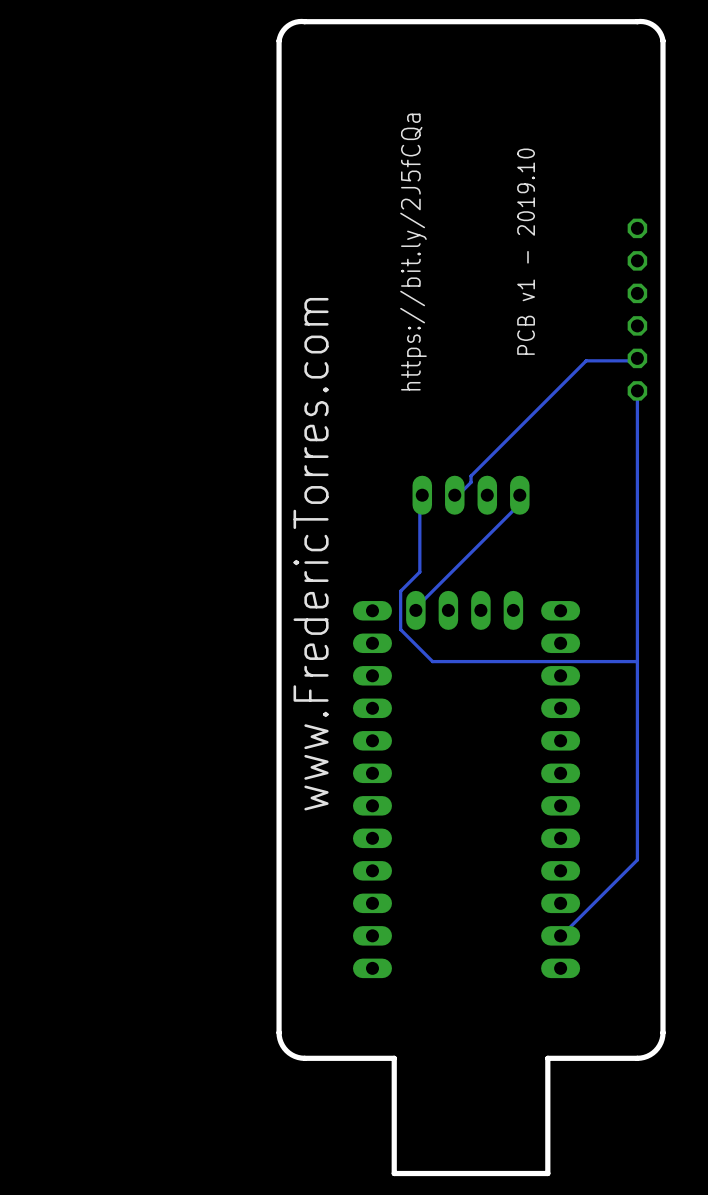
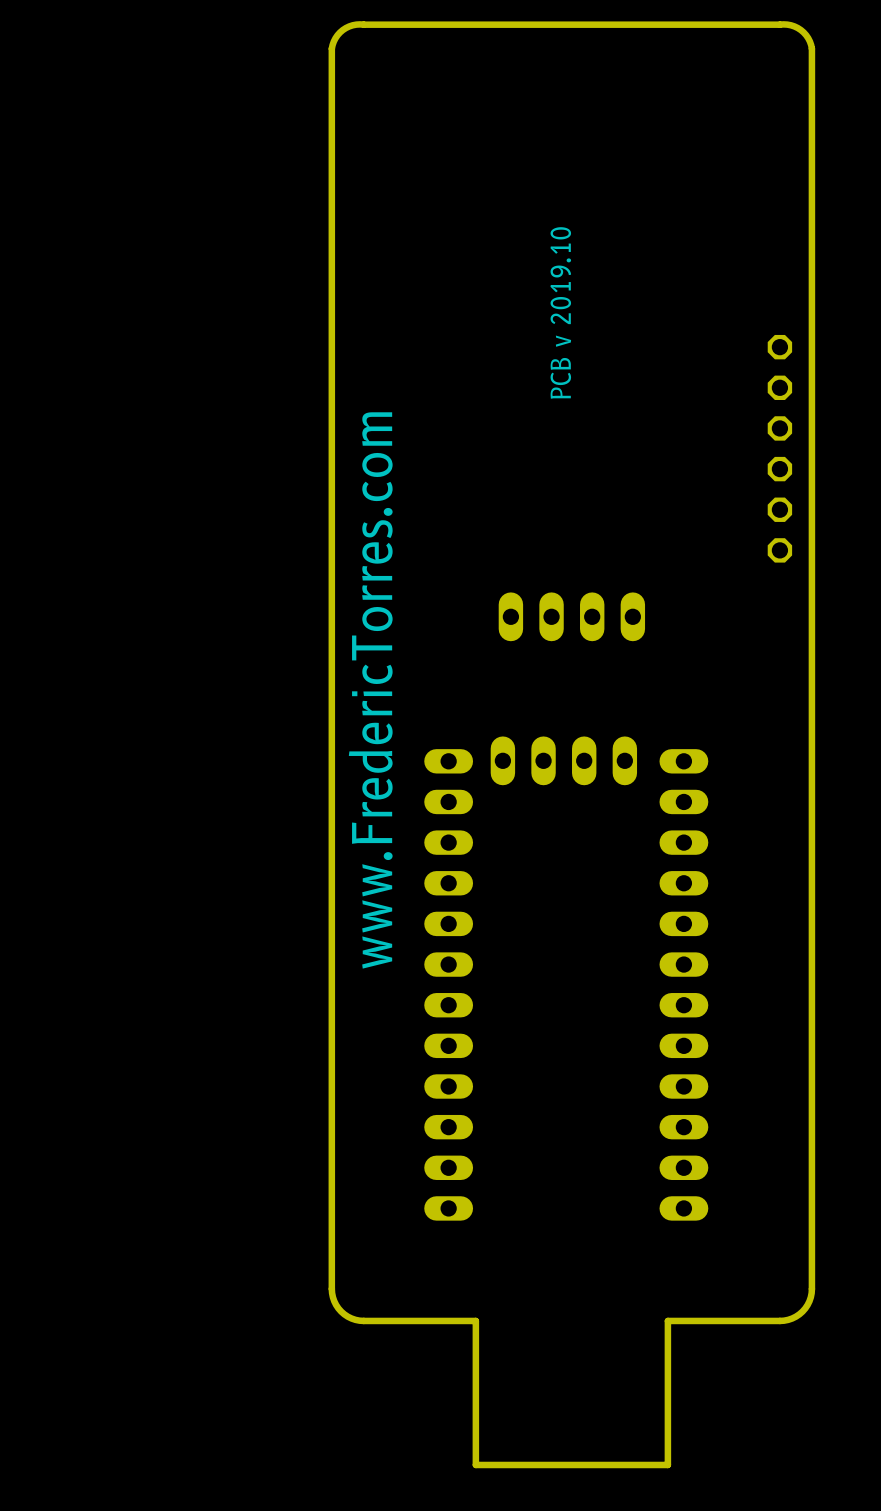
text: none -> PCB v 2019.10 (560, 312)
text: PCB v1 - 2019.10 (526, 251) -> none
text: https://bit.ly/2J5fCQa (413, 252) -> none
part position: (637, 309) -> (779, 448)
track: (637, 358) (637, 360) (586, 360) (471, 476) (471, 482) (458, 495) (454, 495) -> none
track: (637, 390) (637, 859) (560, 935) -> none
track: (422, 495) (419, 495) (419, 572) (400, 591) (400, 629) (432, 661) (637, 661) -> none
track: (519, 495) (515, 495) (515, 508) (413, 610) (415, 610) -> none

